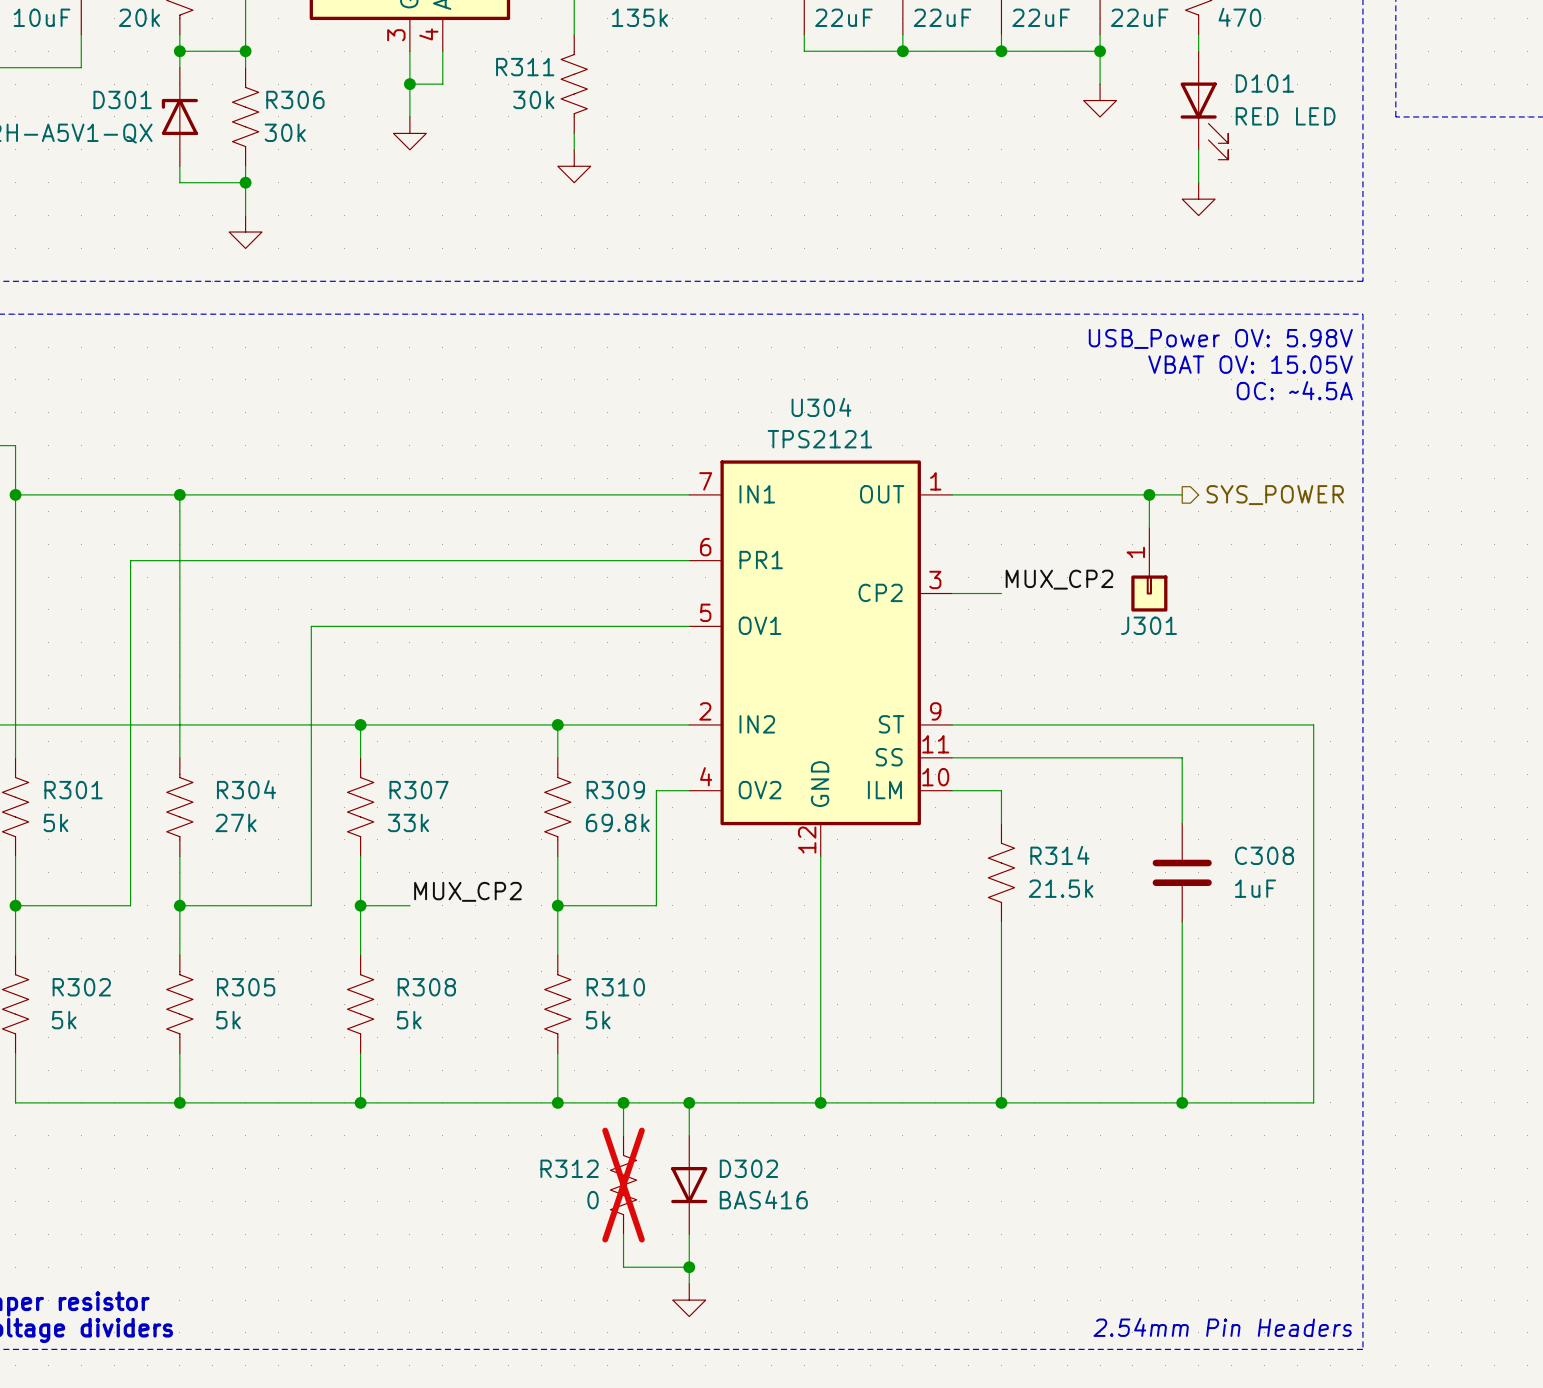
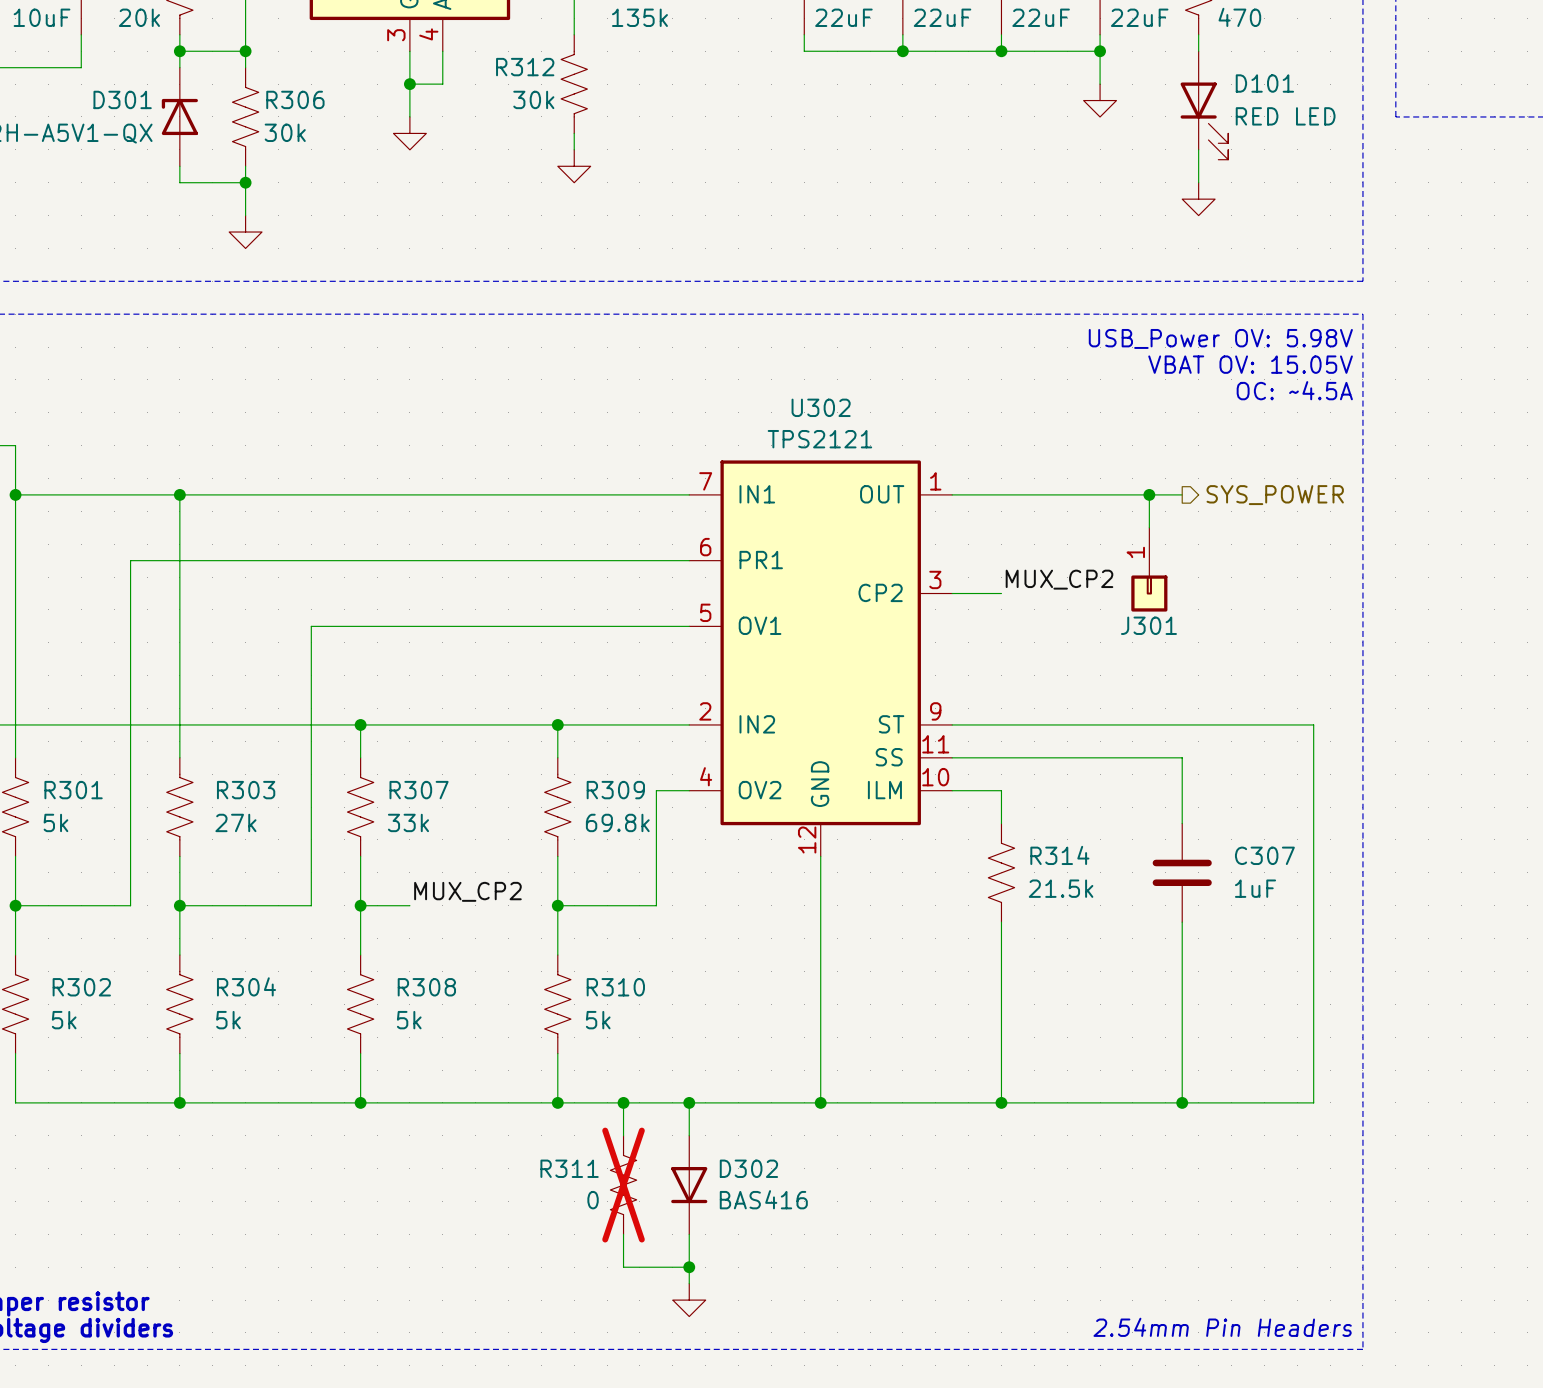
R311 name: R311 (525, 67) -> R312 (525, 67)
U304 name: U304 (821, 407) -> U302 (821, 407)
R304 name: R304 (246, 789) -> R303 (246, 790)
C308 name: C308 (1264, 855) -> C307 (1264, 855)
R305 name: R305 (246, 987) -> R304 (246, 986)
R312 name: R312 (569, 1168) -> R311 (569, 1168)

